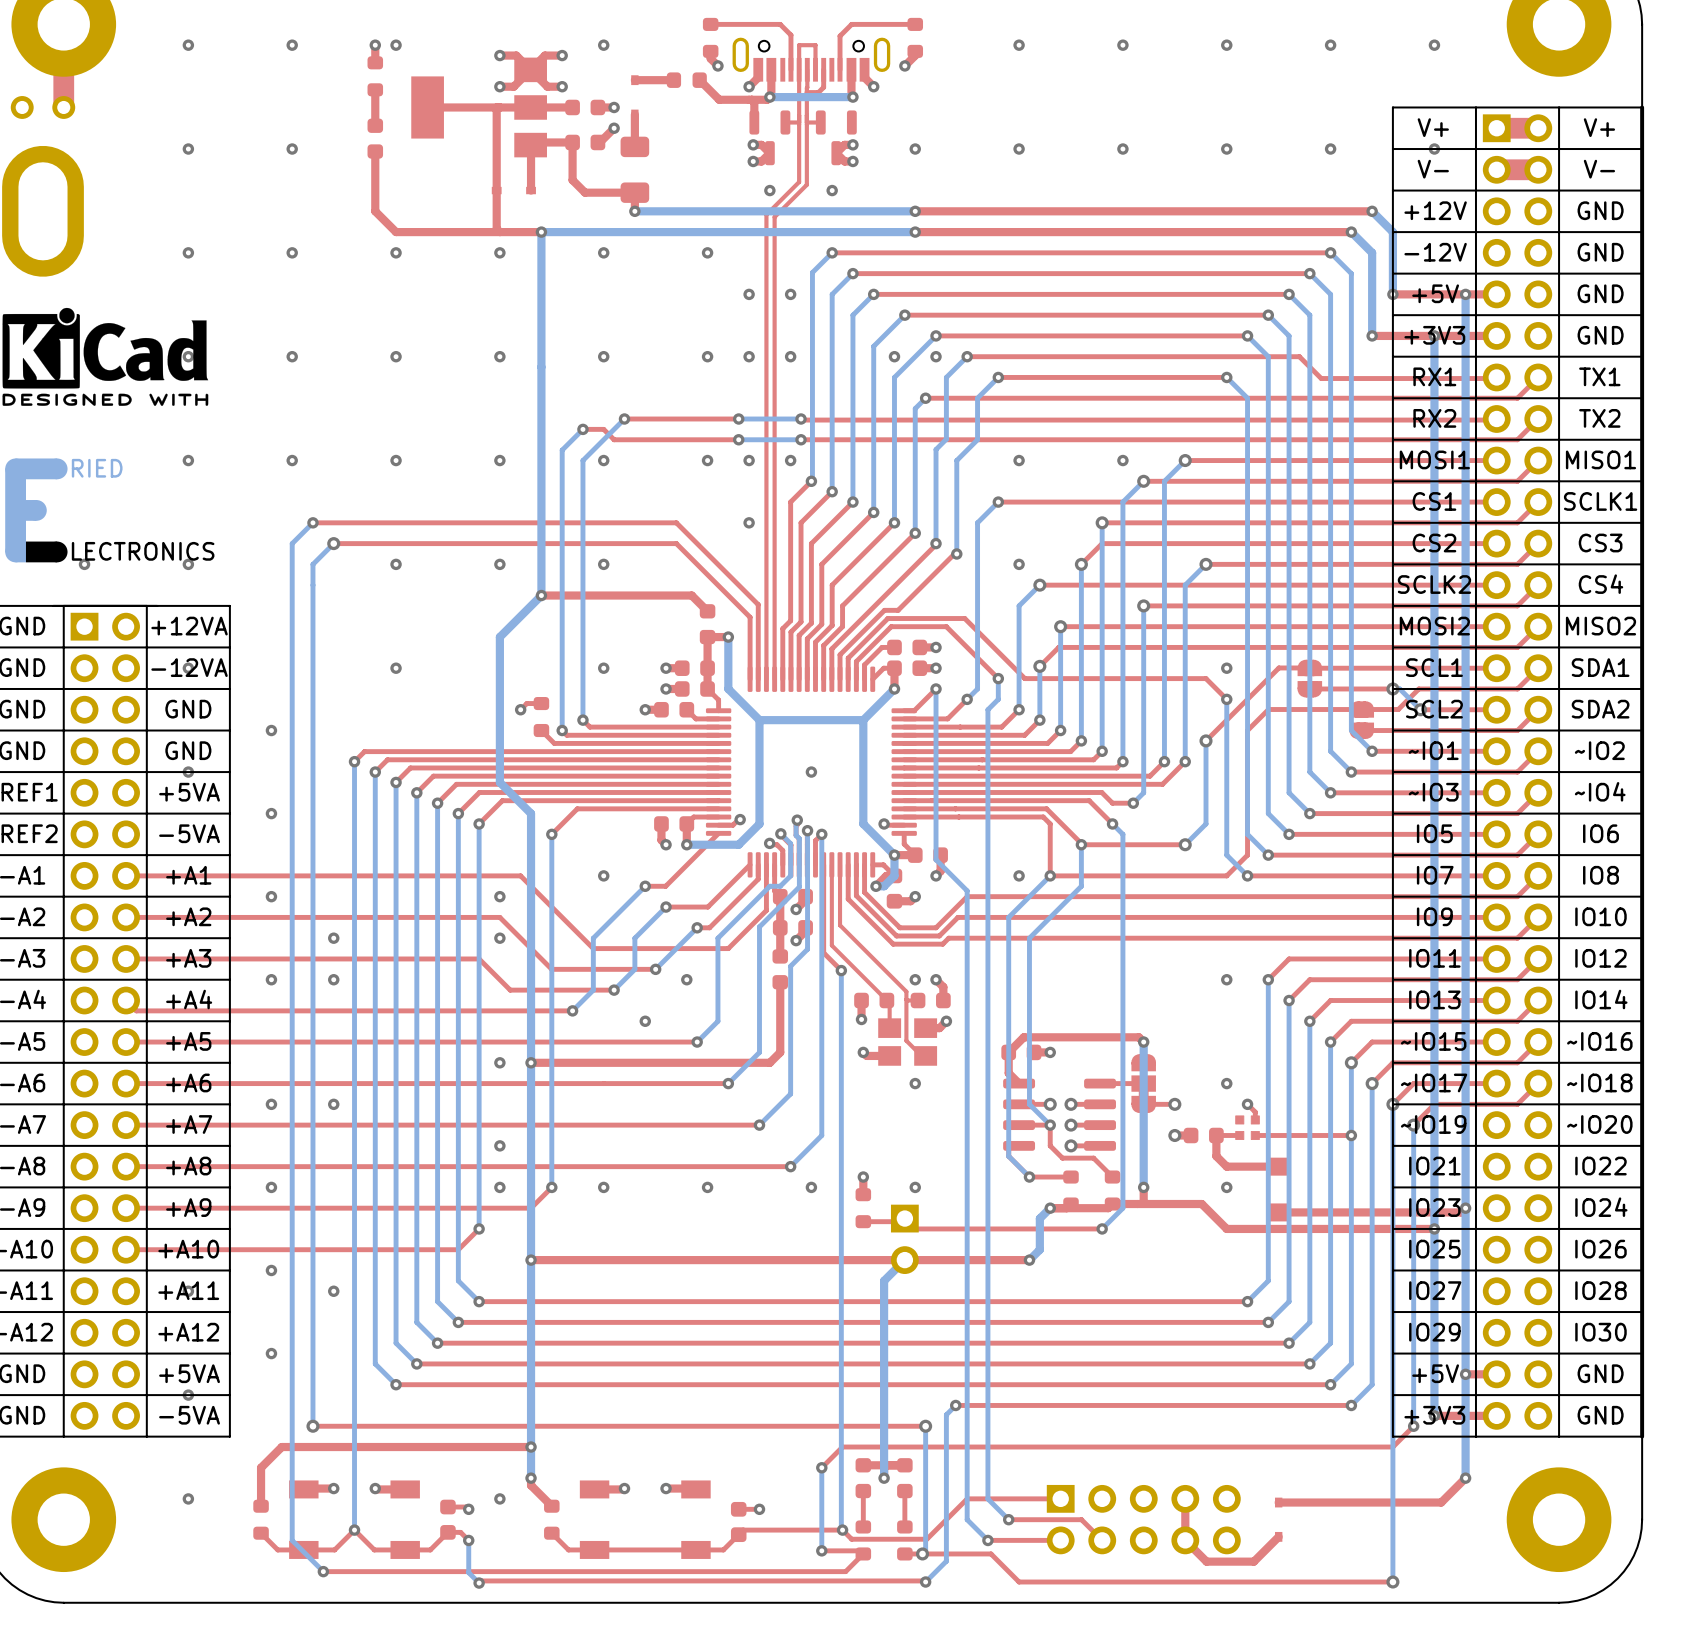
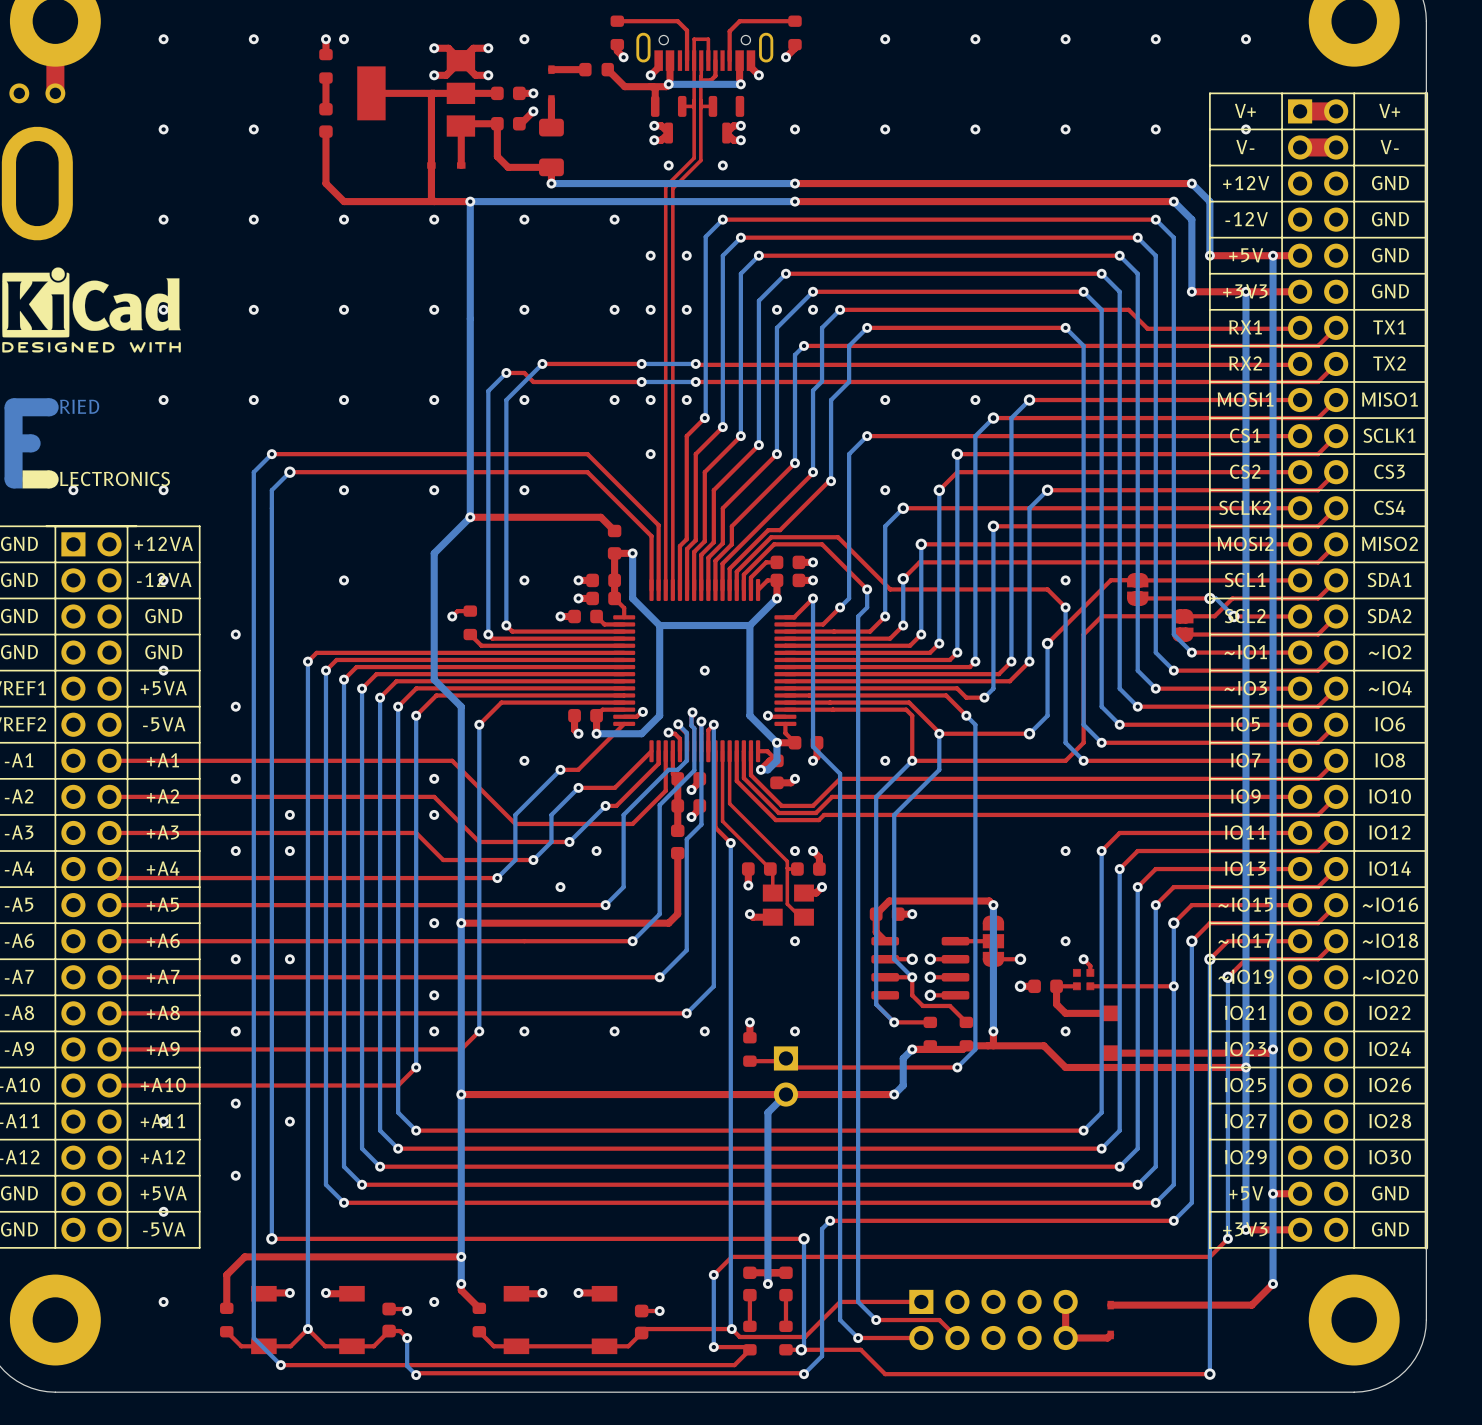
top track: (1185, 1498) (1185, 1540) (1206, 1561) (1253, 1561) (1275, 1540) -> (1065, 1301) (1065, 1338) (1107, 1338)

